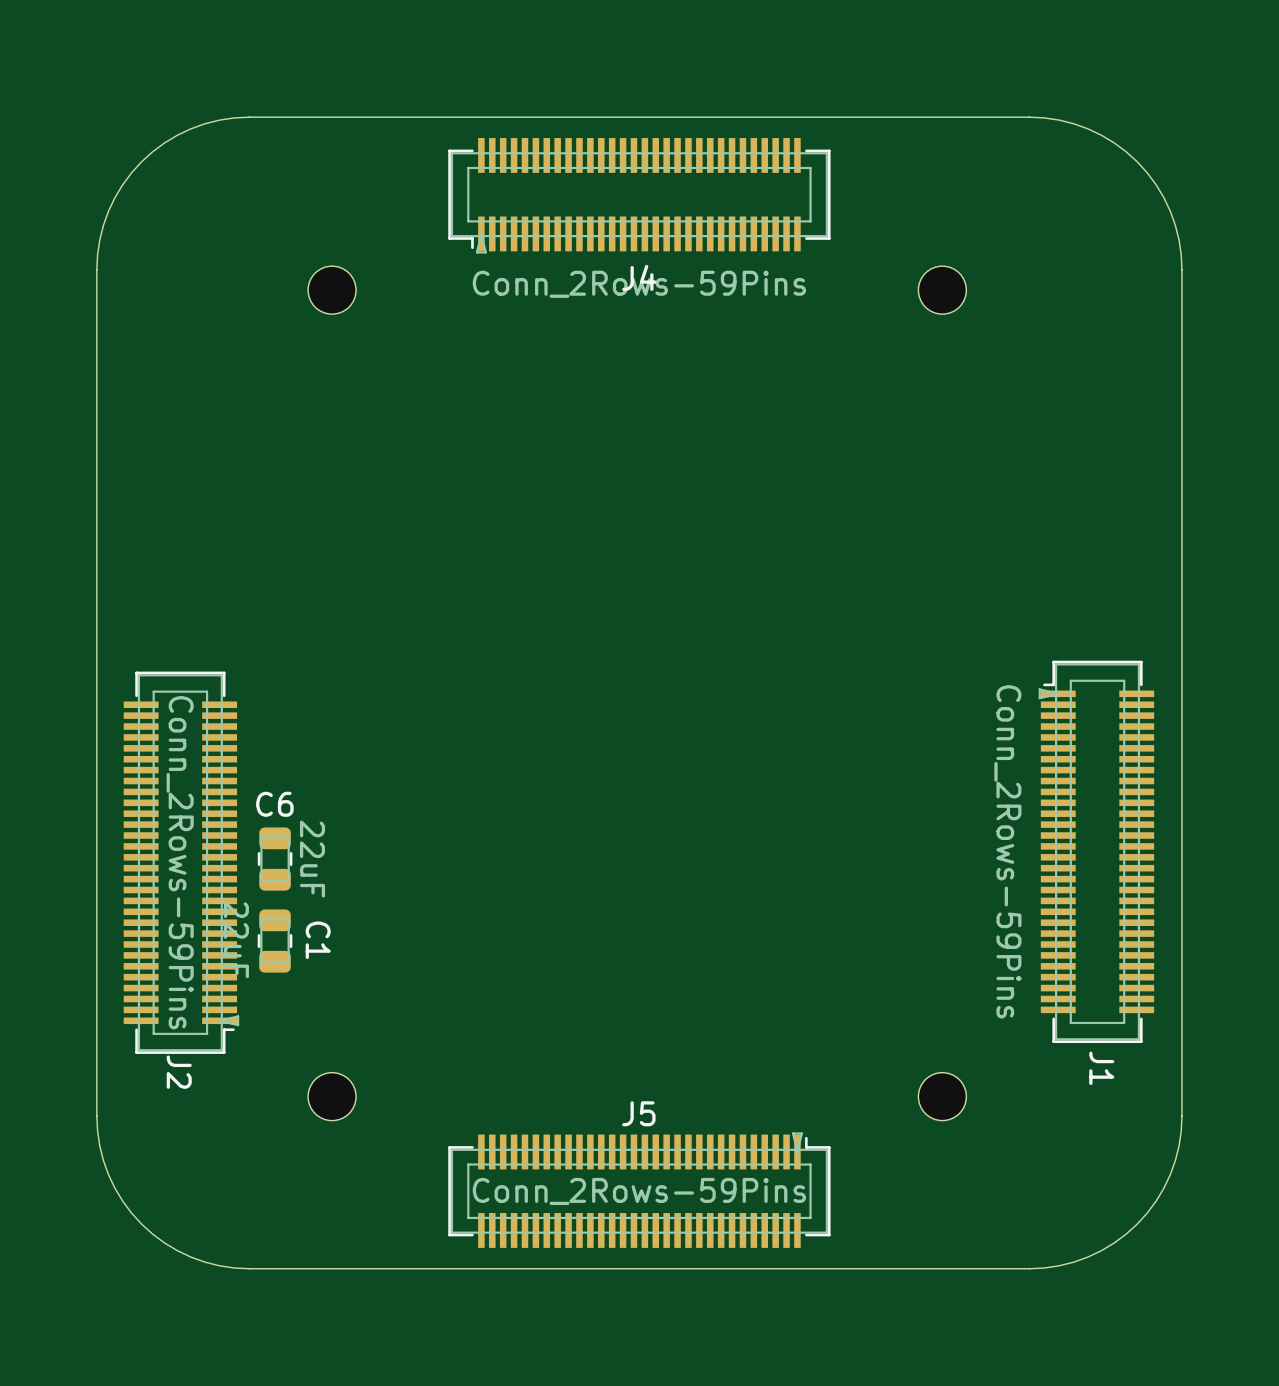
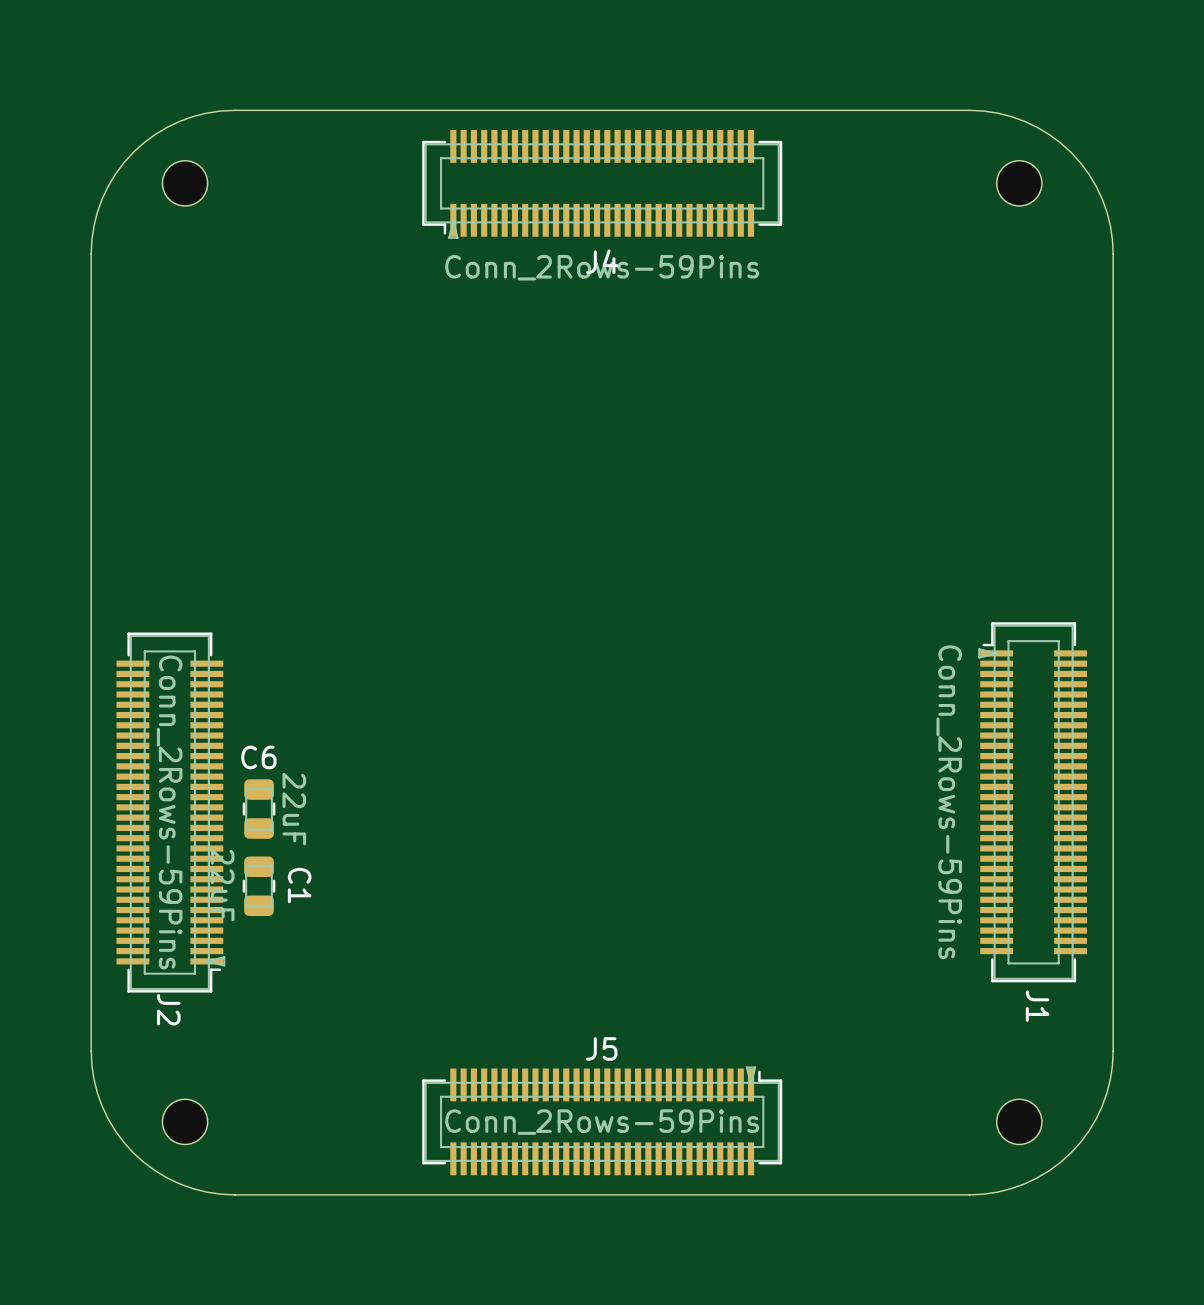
part position: (332, 290) -> (185, 183)
part position: (942, 290) -> (1019, 183)
part position: (332, 1096) -> (185, 1121)
part position: (942, 1096) -> (1019, 1121)

